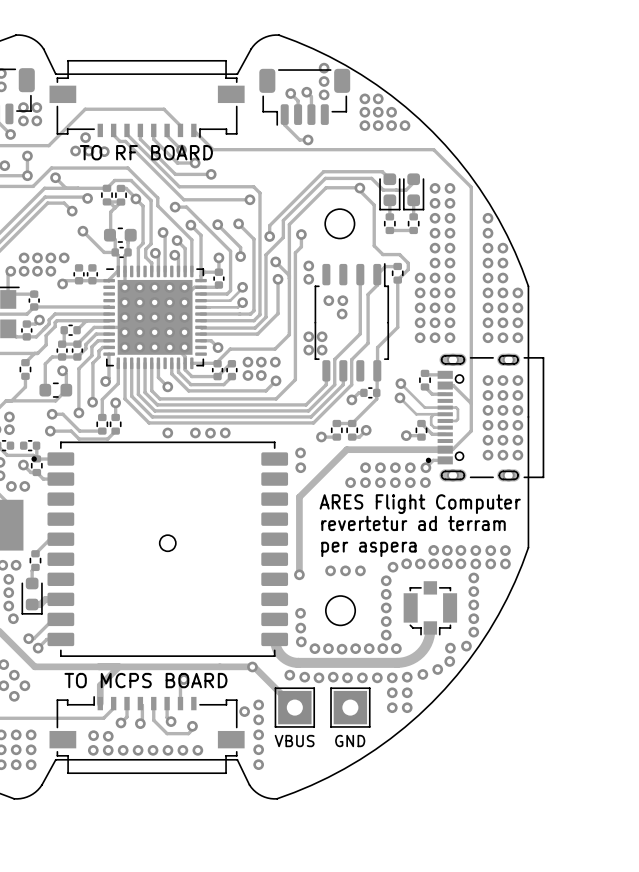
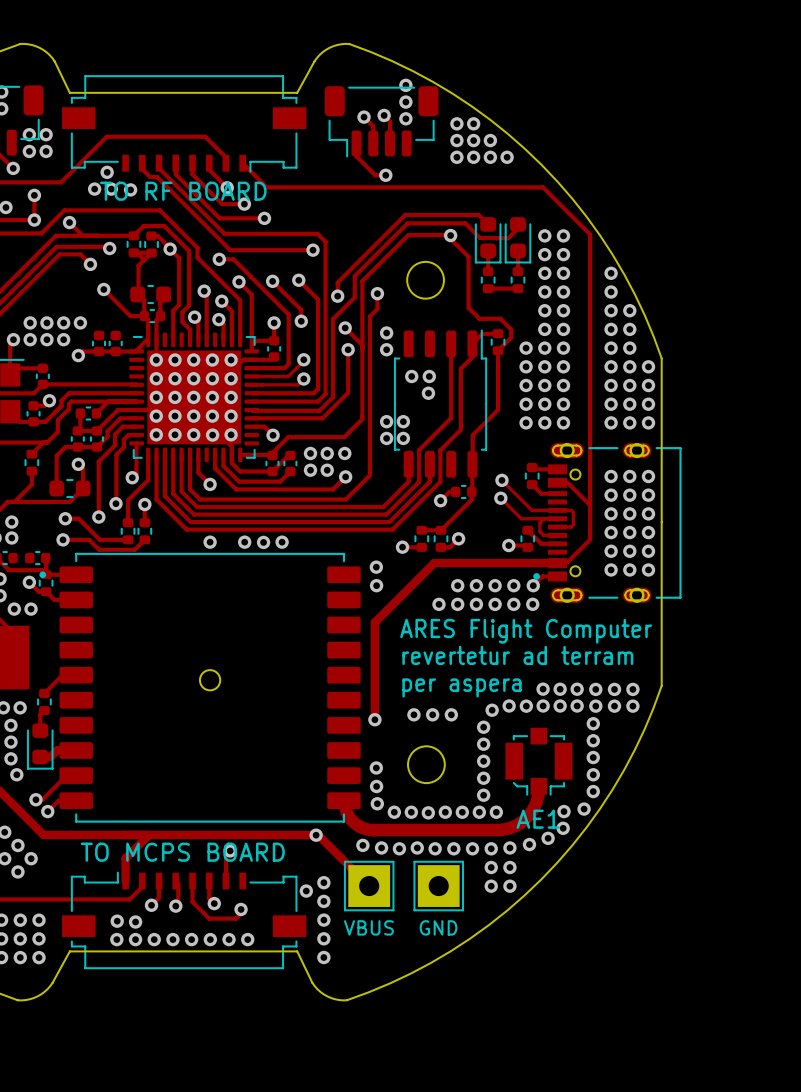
AE1 name: none -> AE1 (538, 819)

